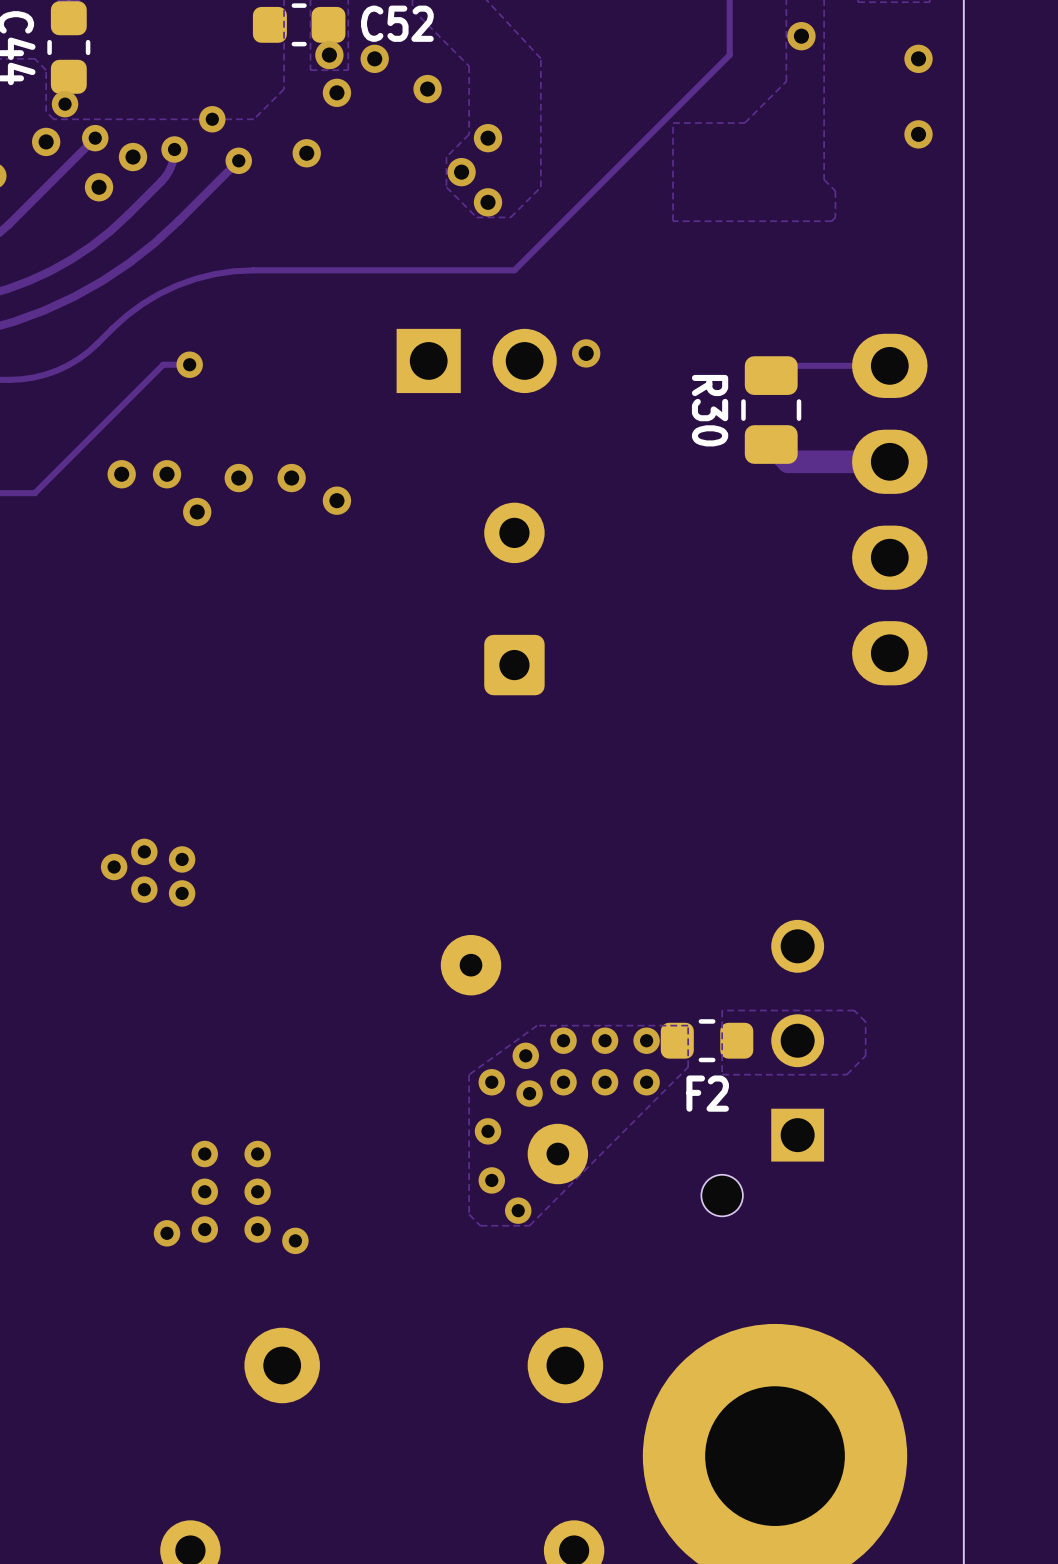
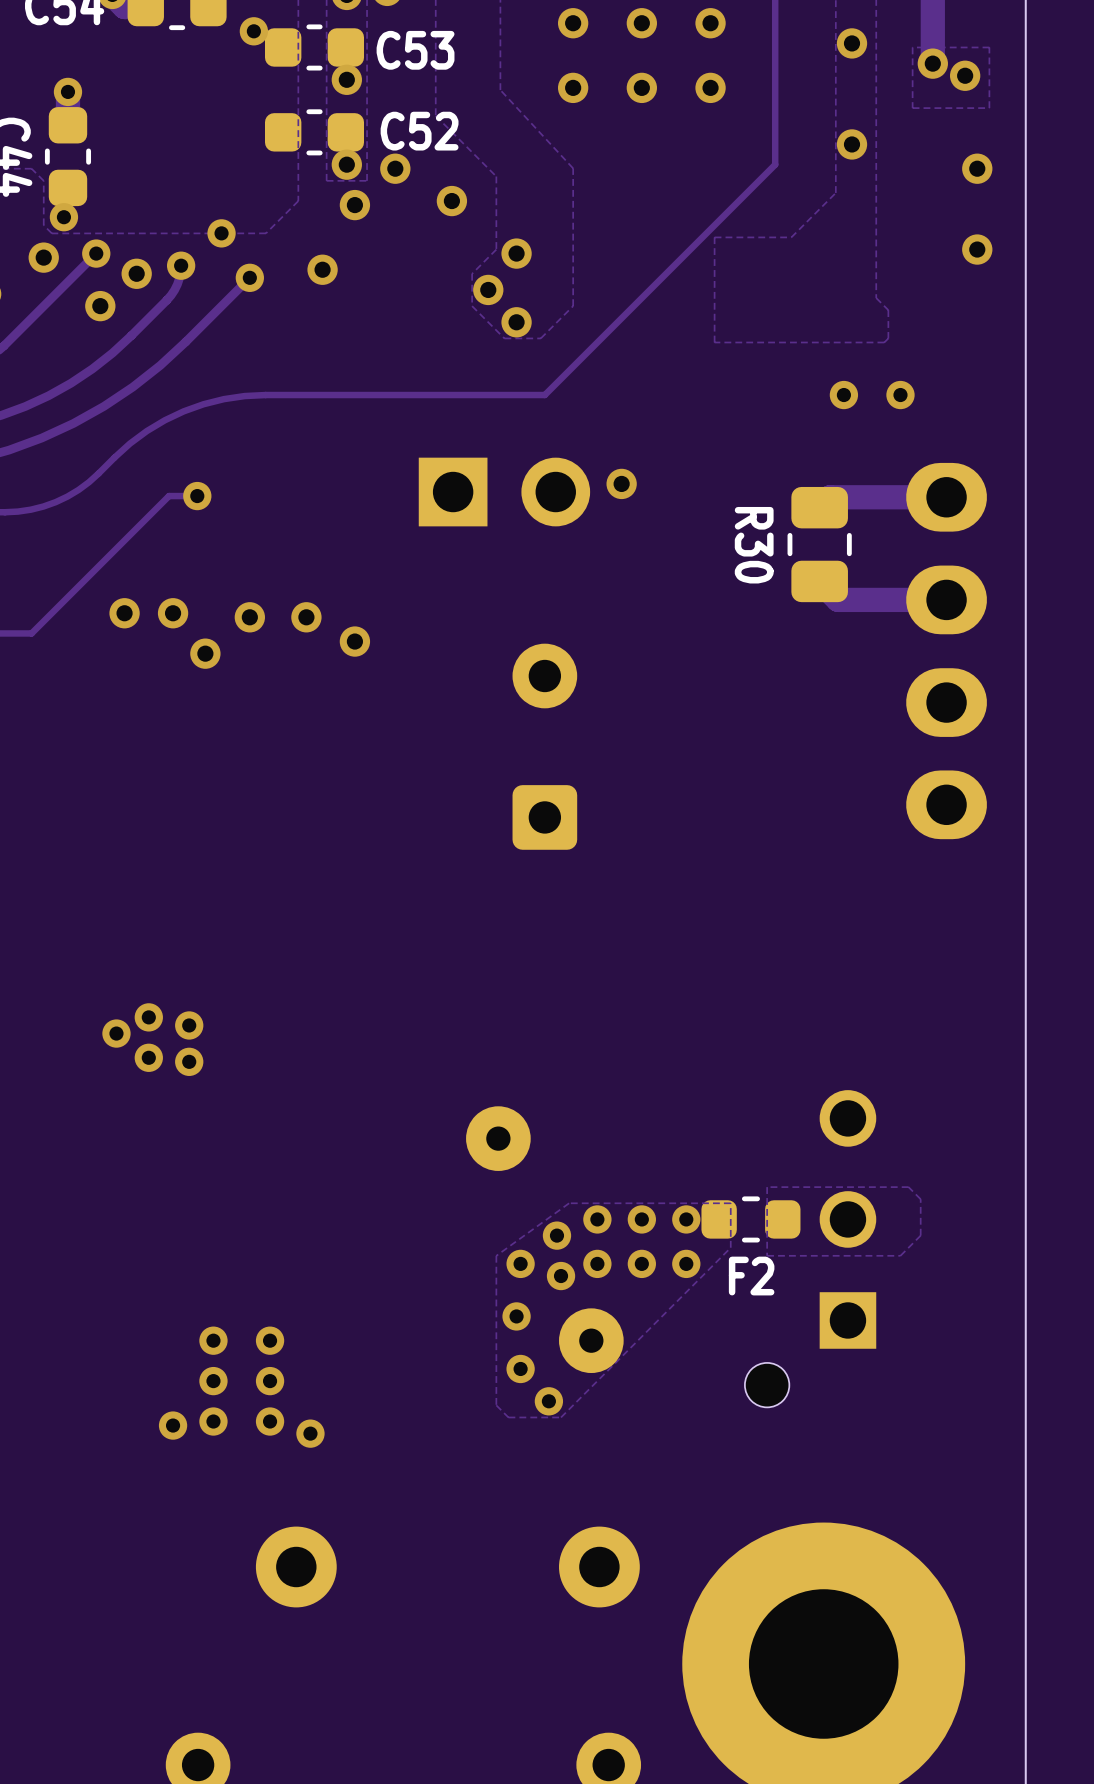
via: none -> (843, 395)
via: none -> (900, 395)
track width: thin (889, 365) (780, 365) (771, 375) -> thick (946, 497) (830, 497) (819, 507)

